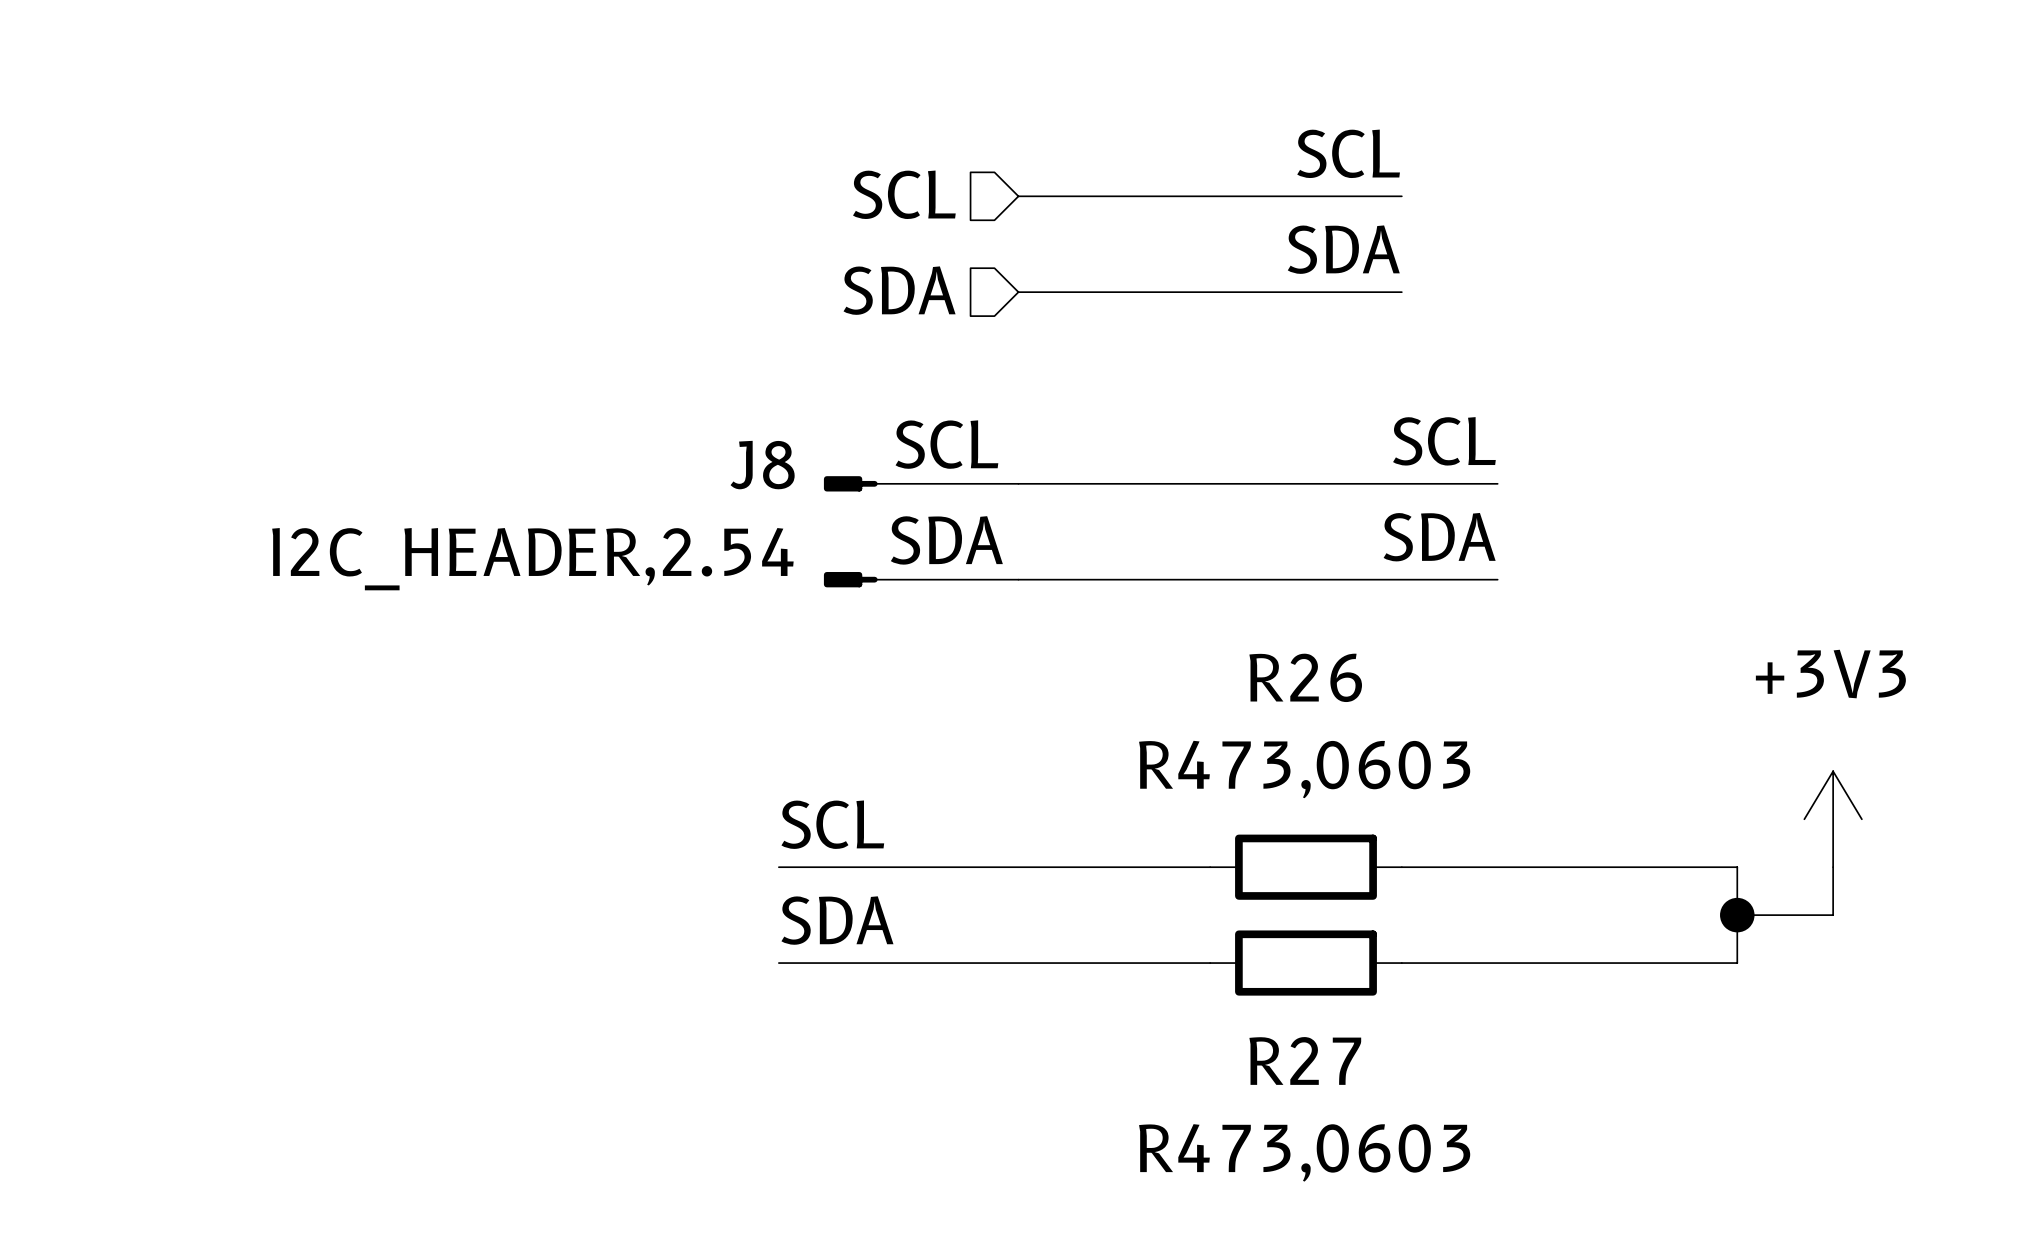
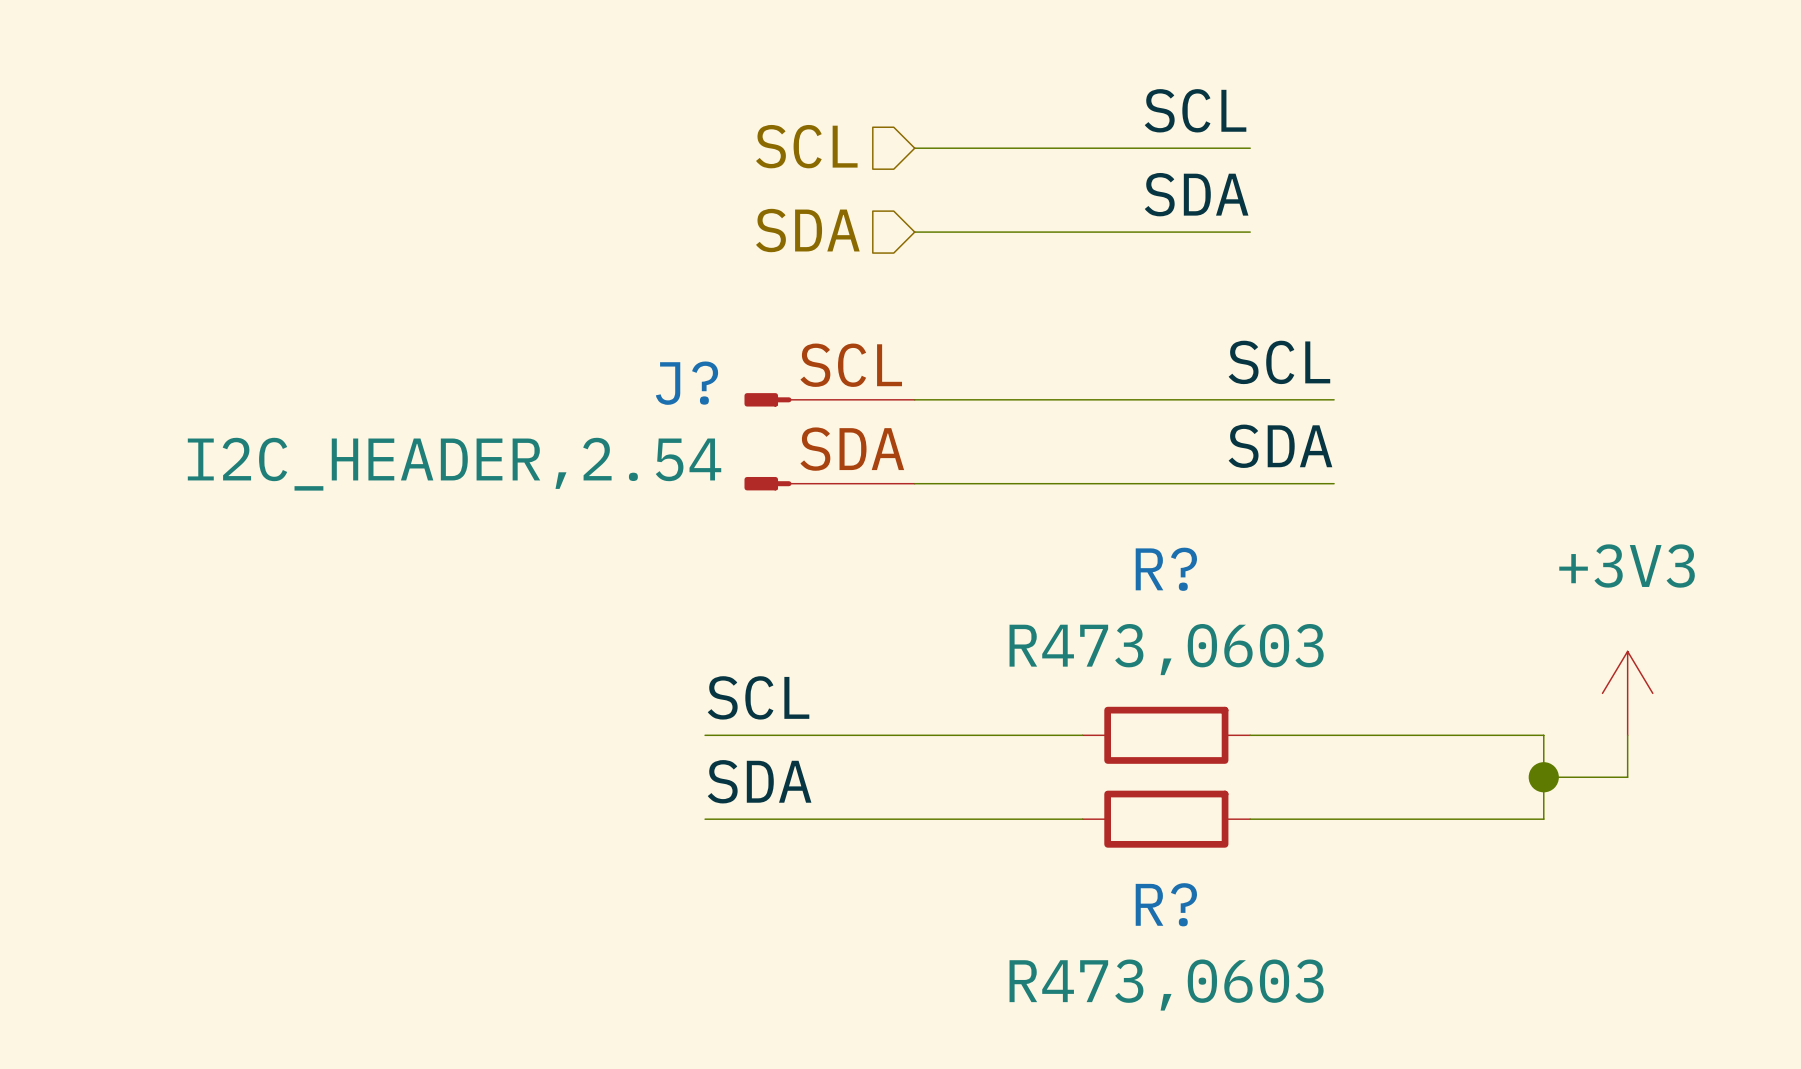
J8 name: J8 (762, 465) -> J? (686, 383)
R26 name: R26 (1305, 677) -> R? (1166, 569)
R27 name: R27 (1305, 1060) -> R? (1166, 904)

